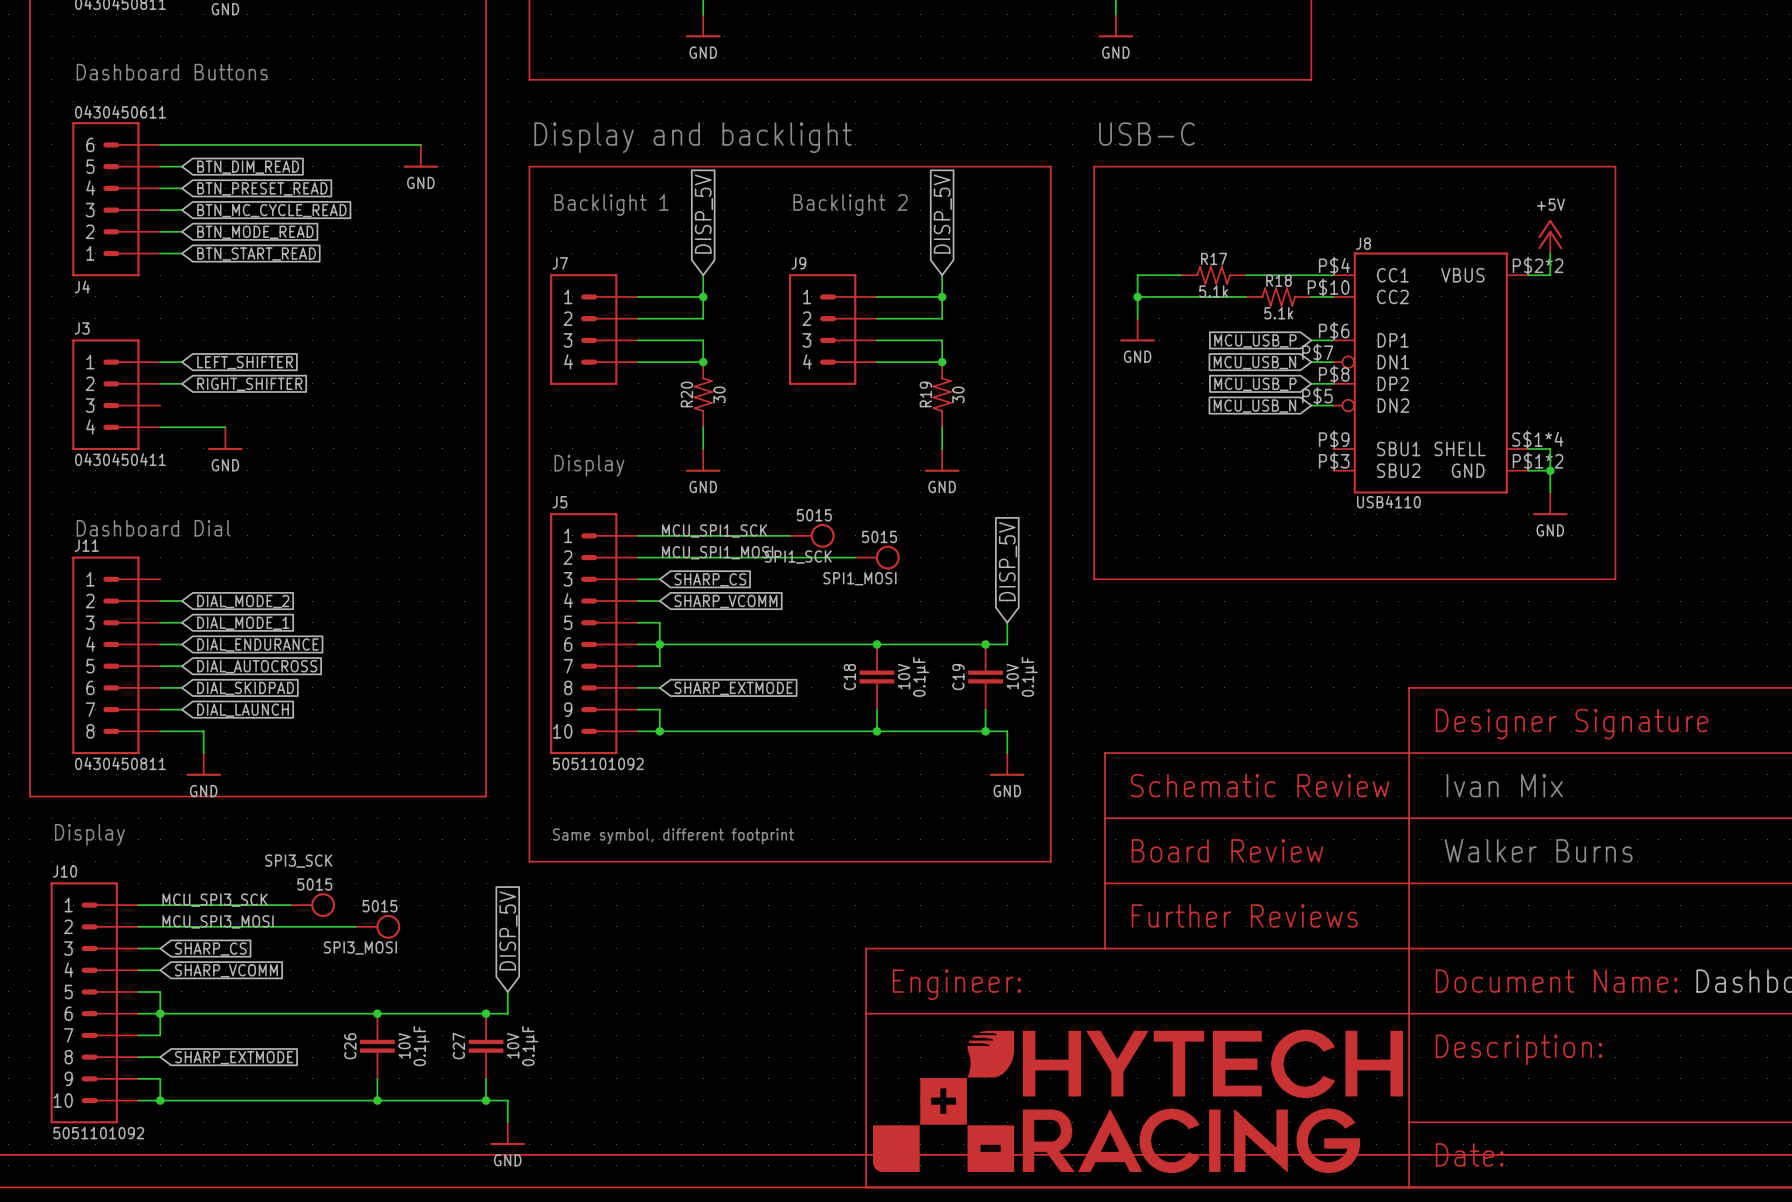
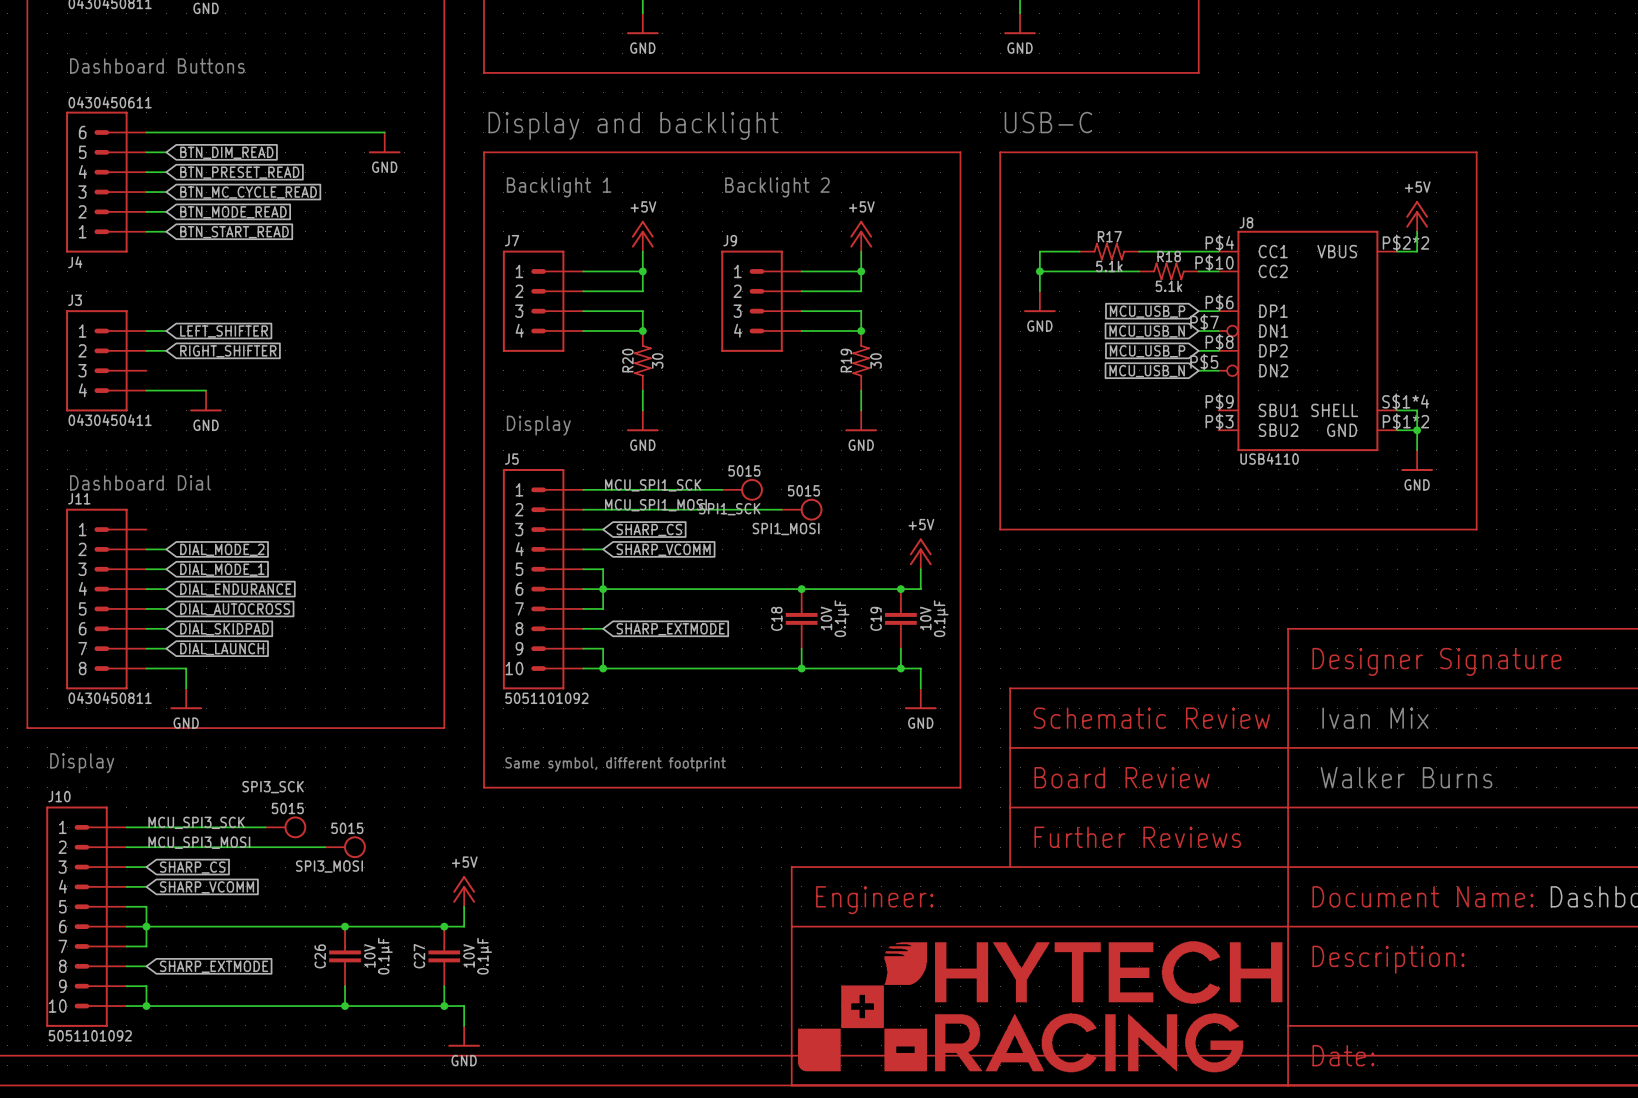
global label: DISP_5V (703, 214) -> none
global label: DISP_5V (942, 214) -> none
power symbol: none -> +5V (642, 236)
power symbol: none -> +5V (861, 236)
global label: DISP_5V (1008, 561) -> none
power symbol: none -> +5V (920, 553)
global label: DISP_5V (508, 930) -> none
power symbol: none -> +5V (464, 891)

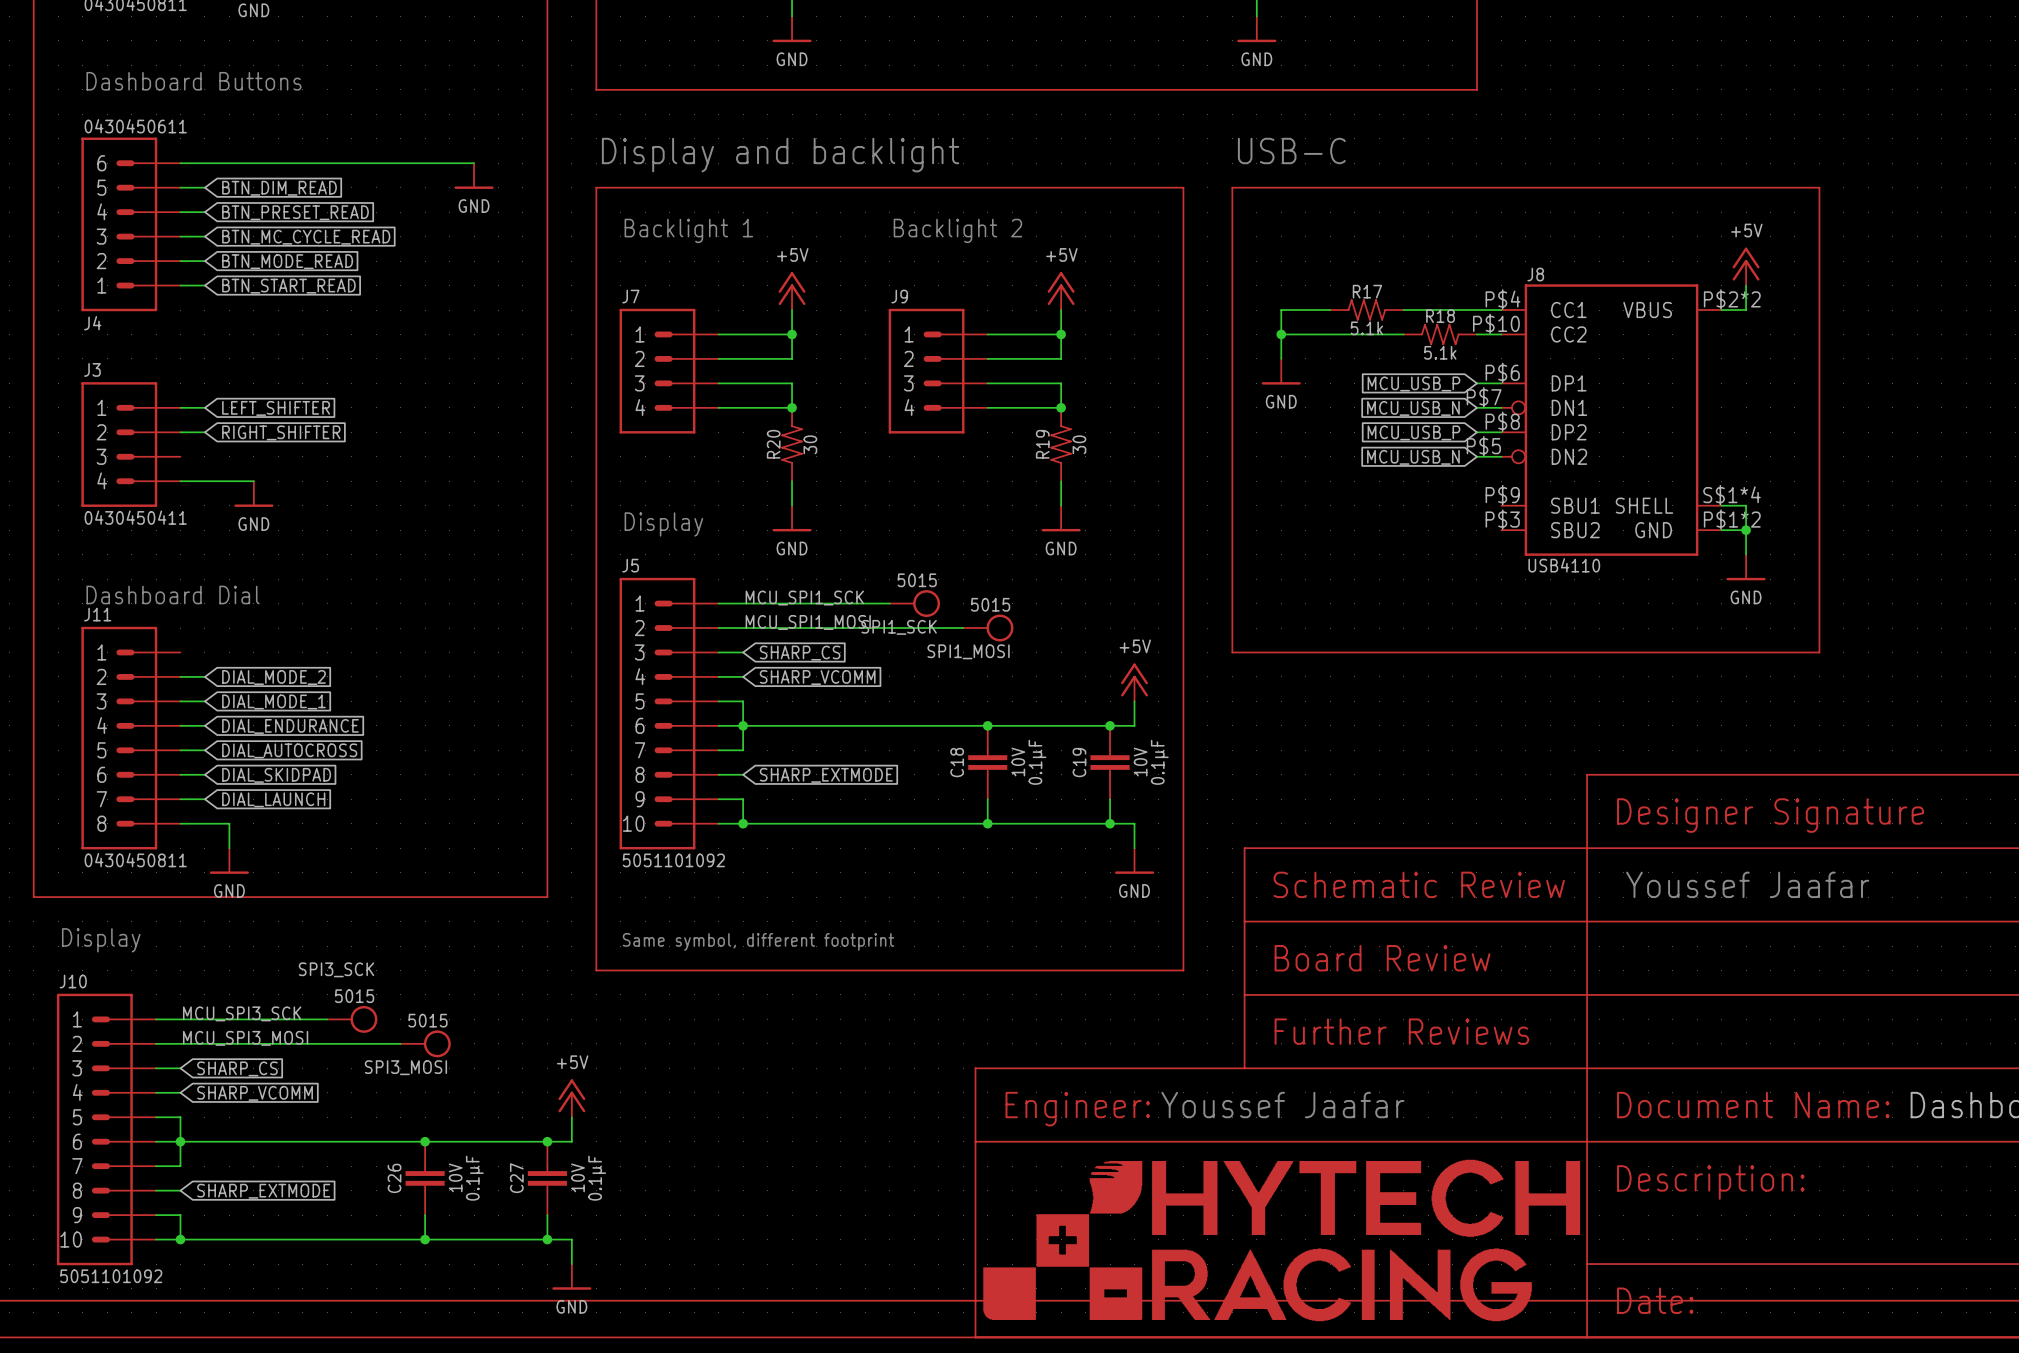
text: Ivan Mix (1375, 718) -> Youssef Jaafar (1747, 884)
text: Walker Burns (1406, 777) -> none
text: none -> Youssef Jaafar (1282, 1105)

